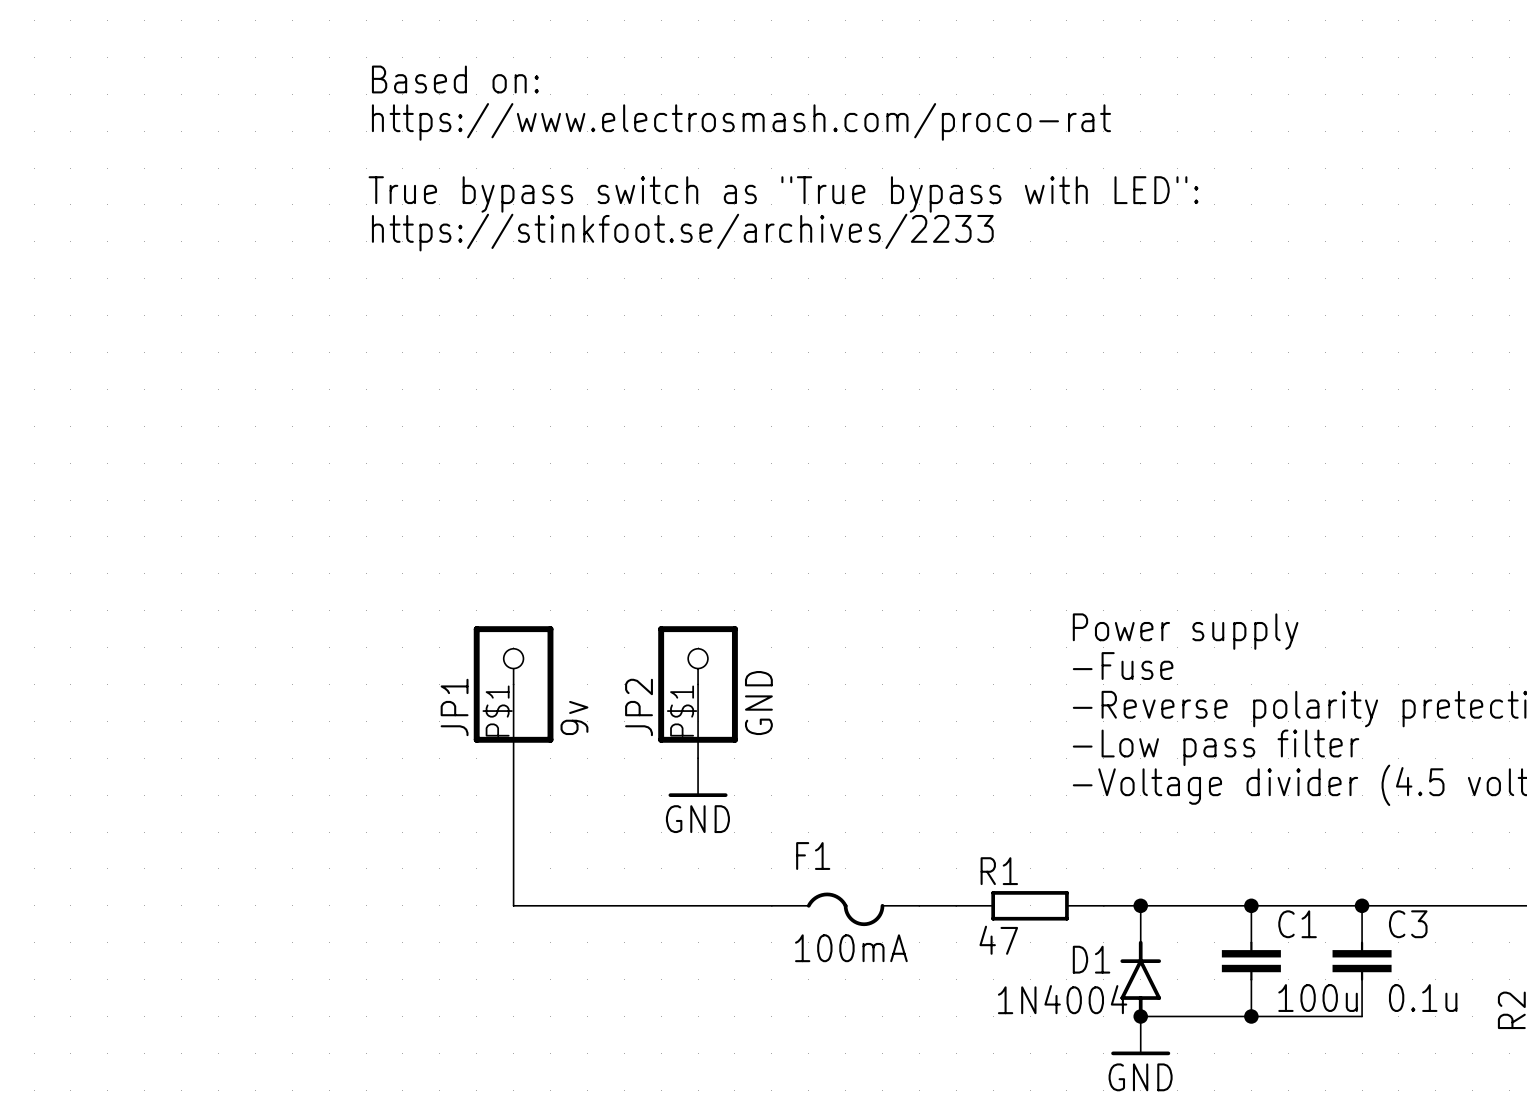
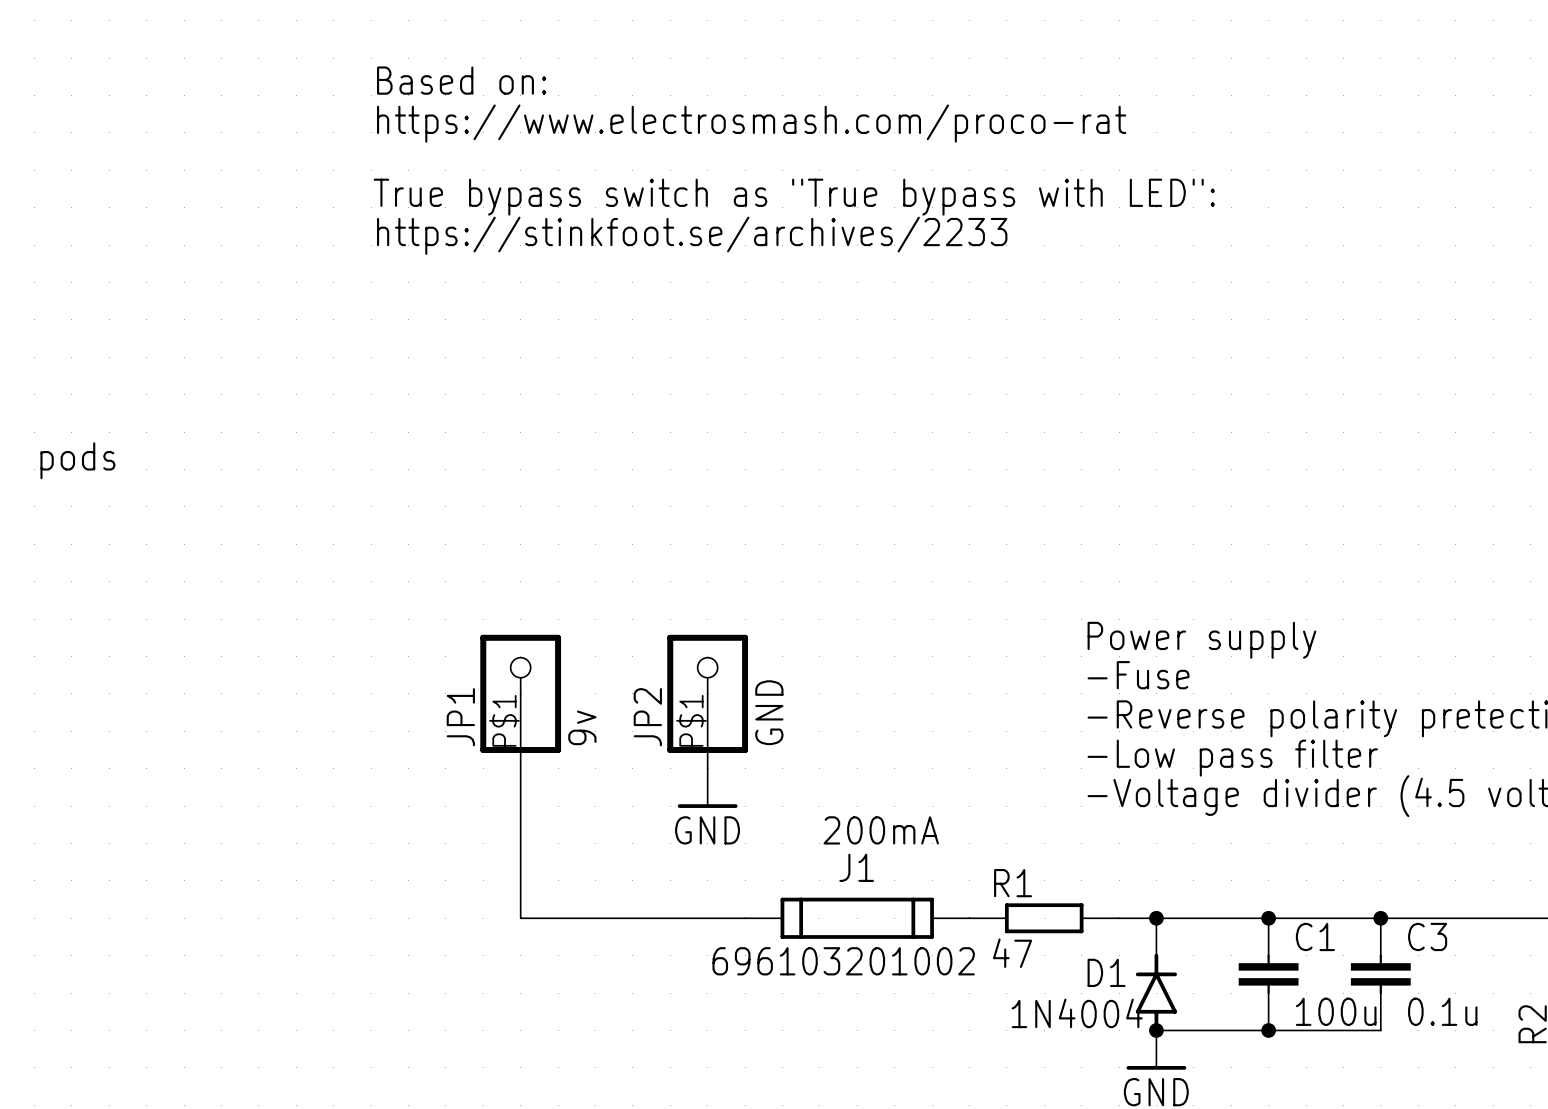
text: none -> pods (77, 460)
text: none -> 200mA (881, 830)
J1: none -> 696103201002 (857, 918)
F1: 100mA (845, 909) -> none

